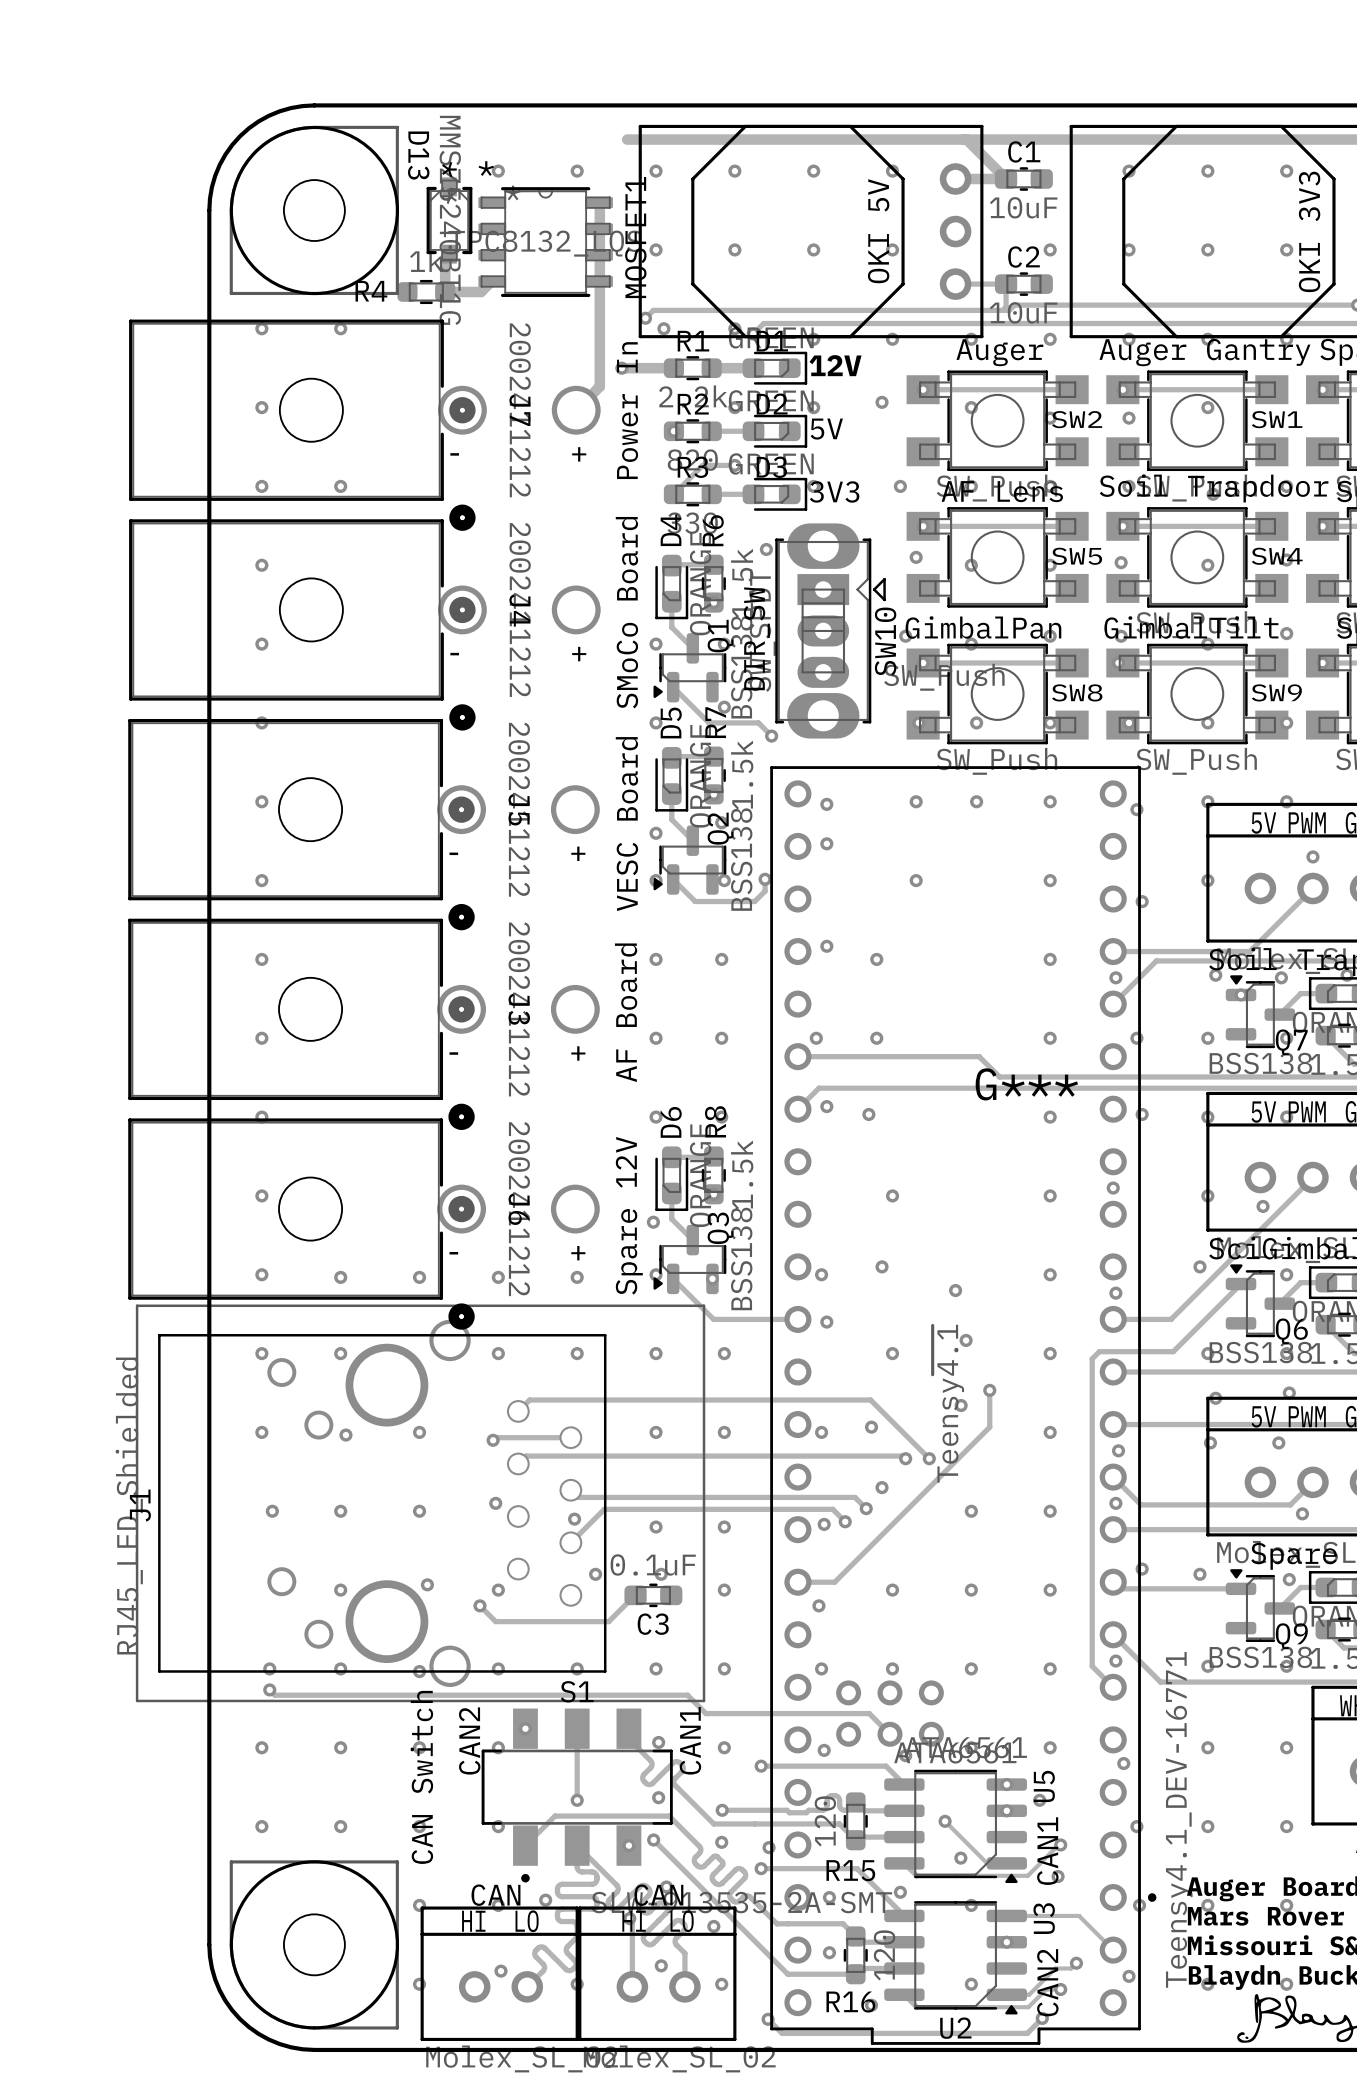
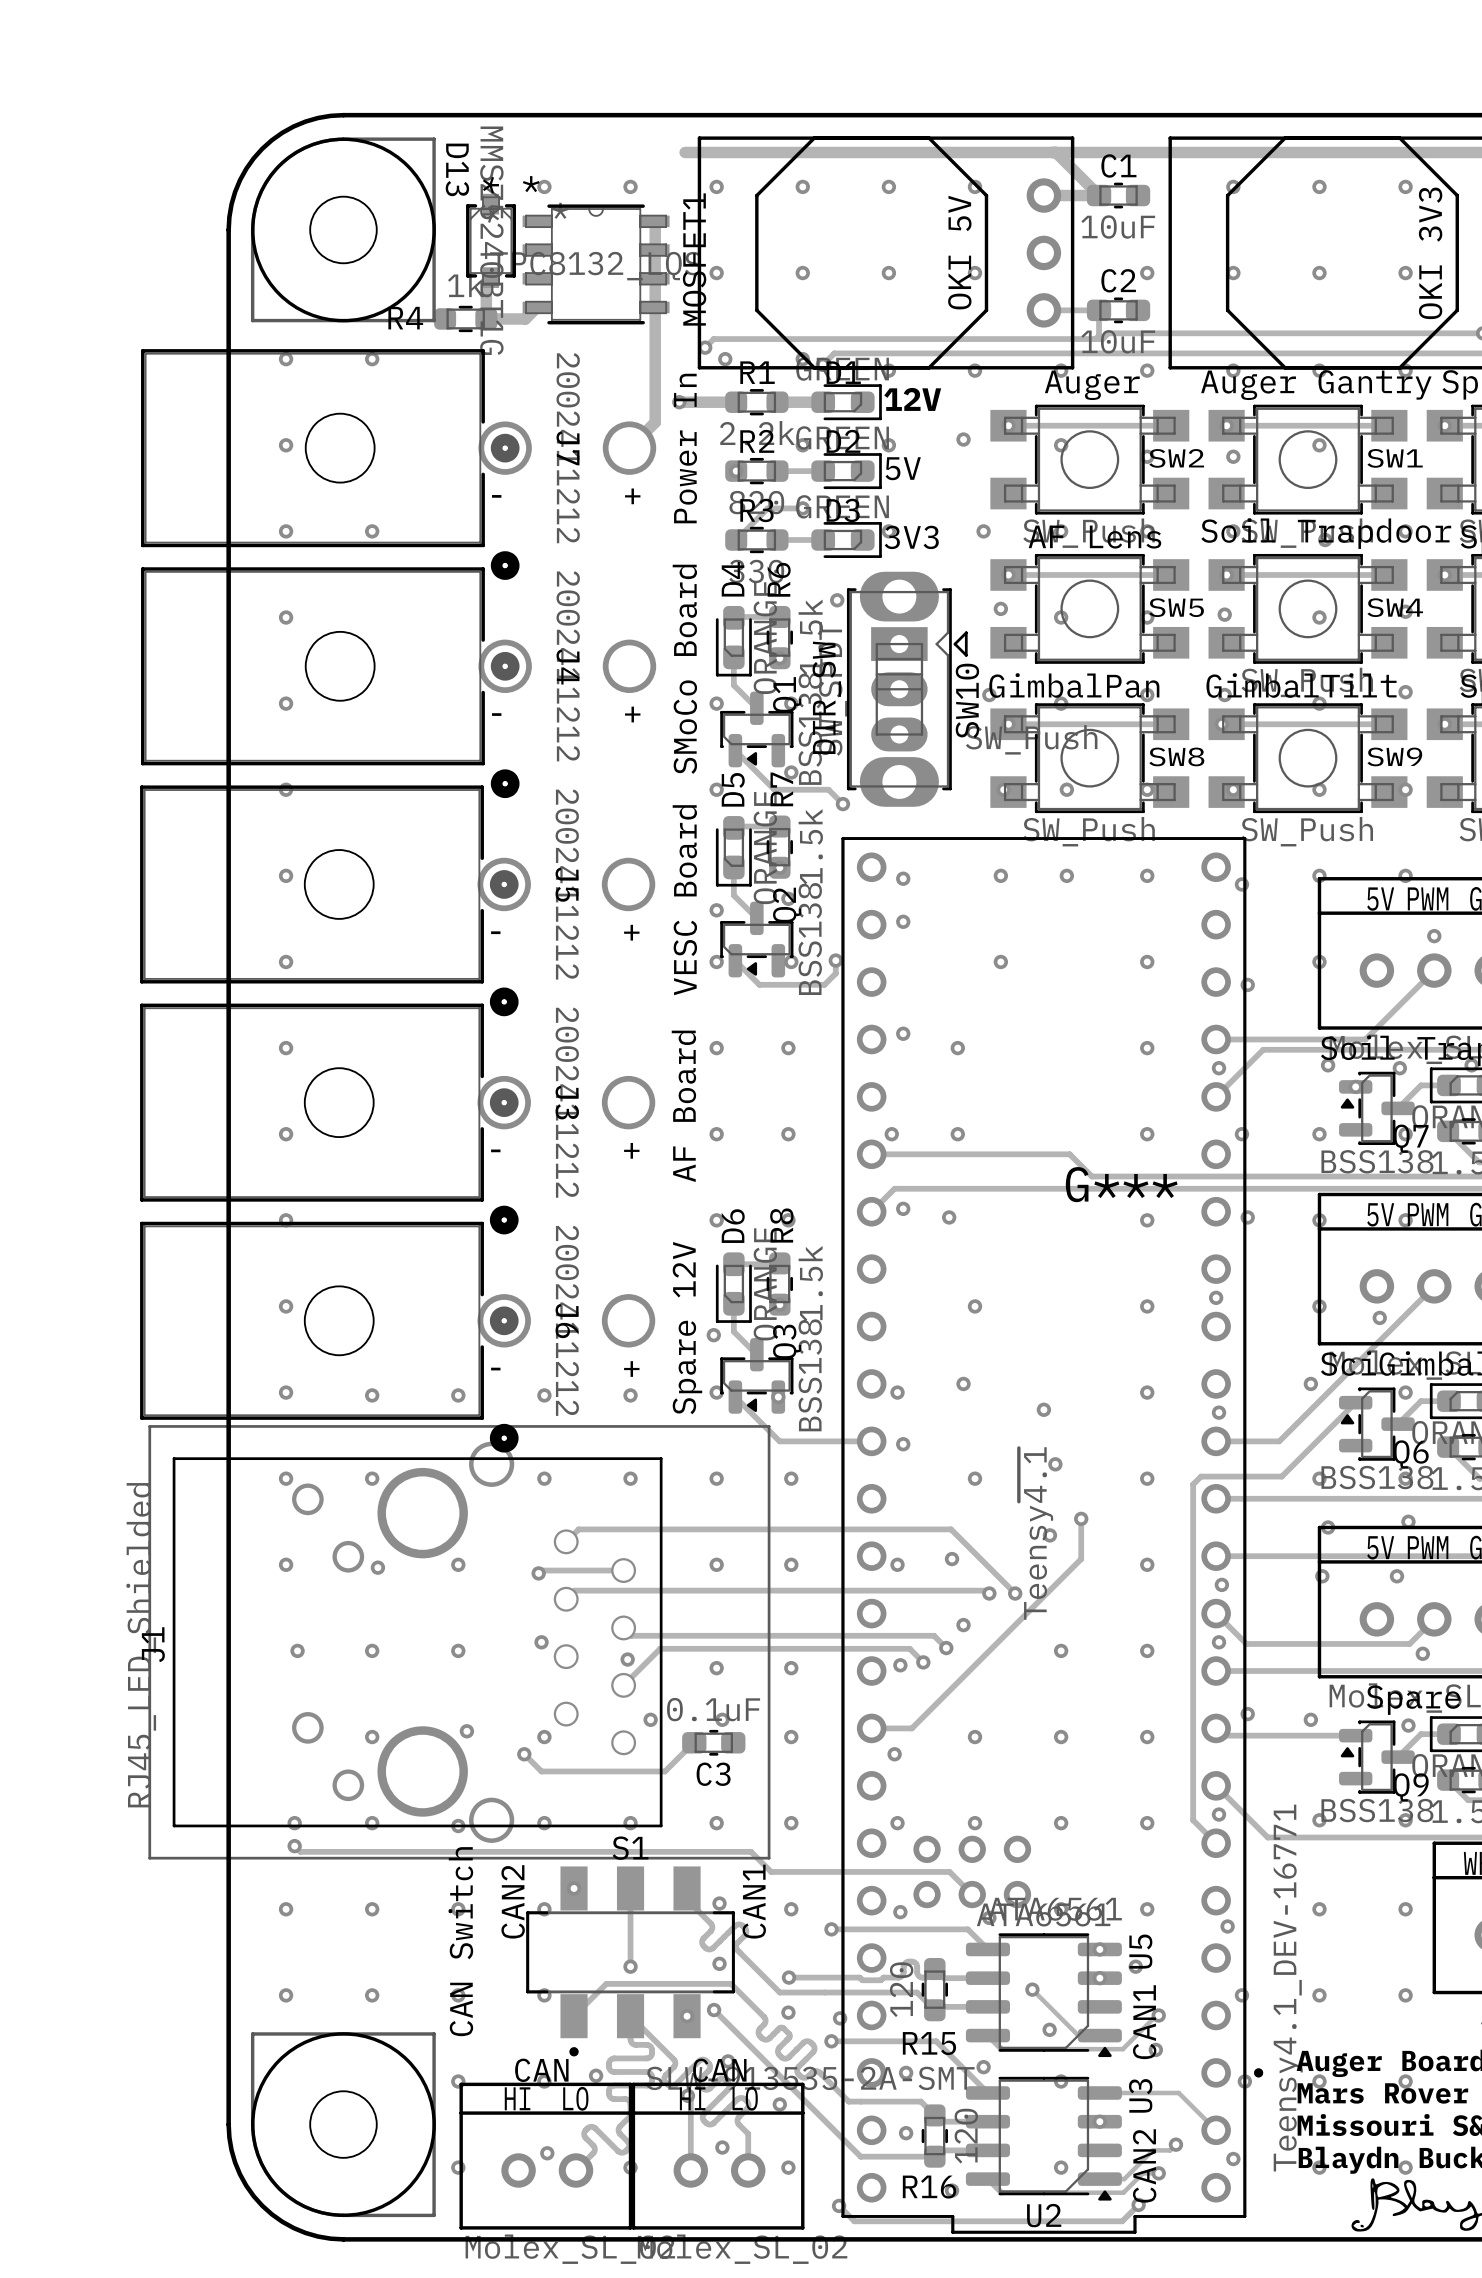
Q1 footprint: [653, 633, 727, 703] -> [720, 691, 794, 768]
Q2 footprint: [653, 825, 727, 895] -> [720, 901, 794, 978]
Q7 footprint: [1225, 975, 1296, 1049] -> [1339, 1071, 1415, 1145]
Q3 footprint: [653, 1224, 727, 1295] -> [720, 1338, 794, 1414]
Q6 footprint: [1225, 1264, 1296, 1338] -> [1339, 1387, 1415, 1461]
Q9 footprint: [1225, 1569, 1296, 1643] -> [1339, 1720, 1415, 1794]

